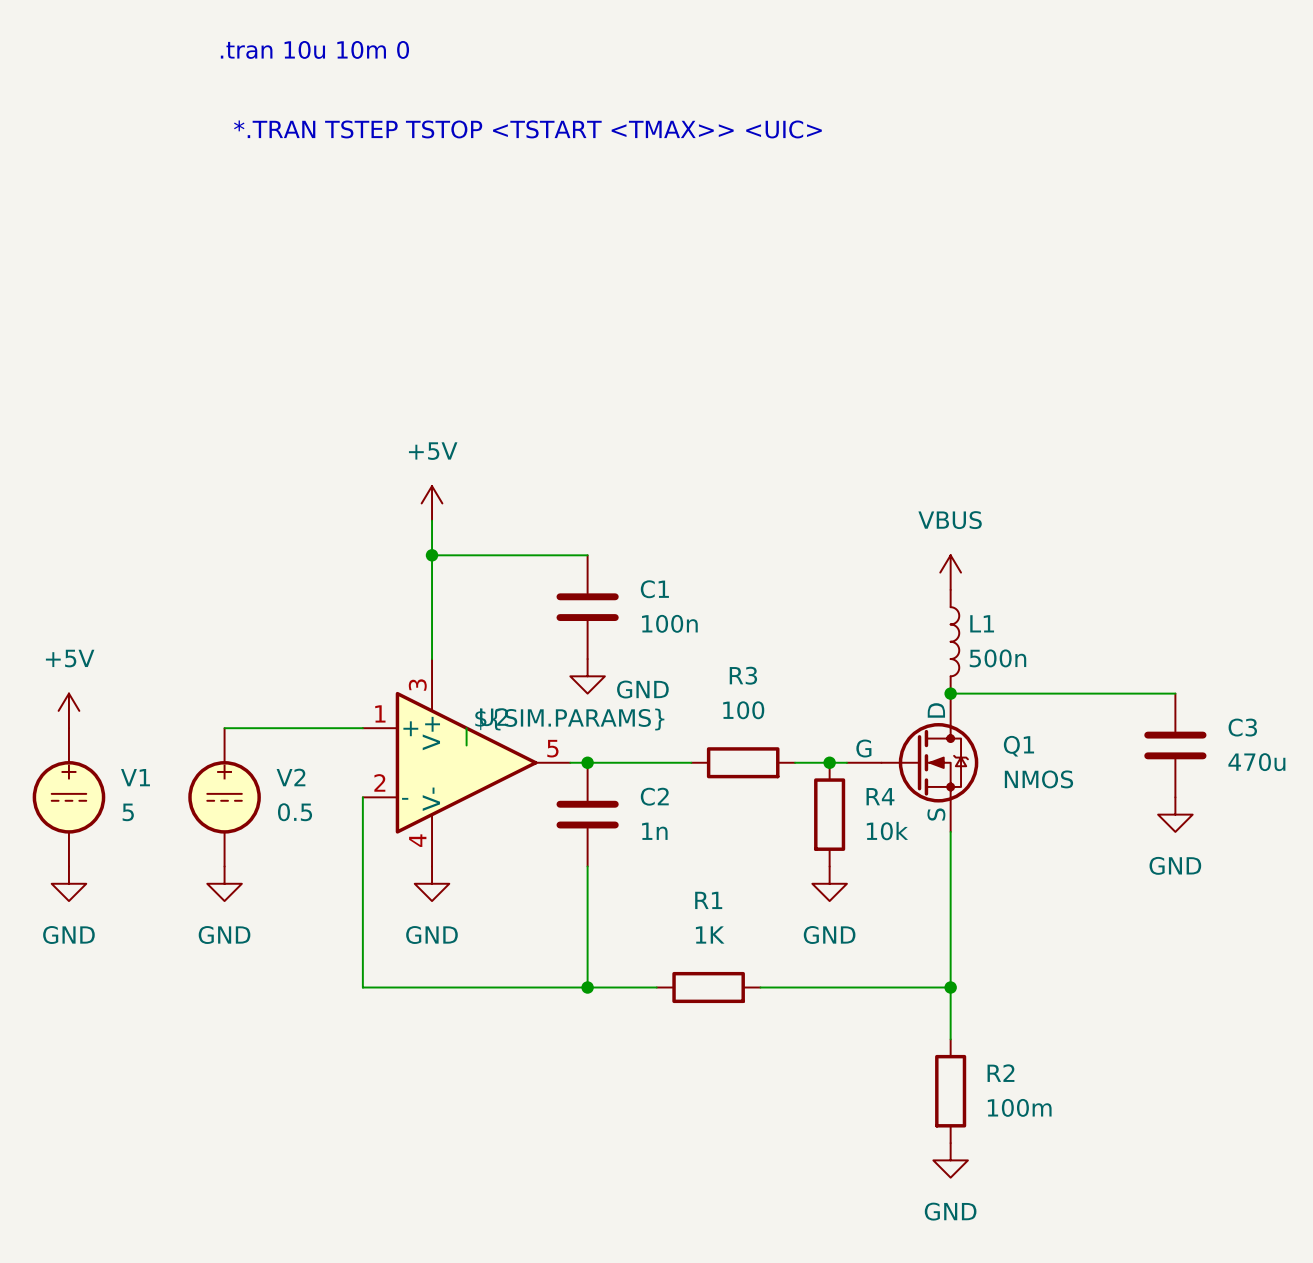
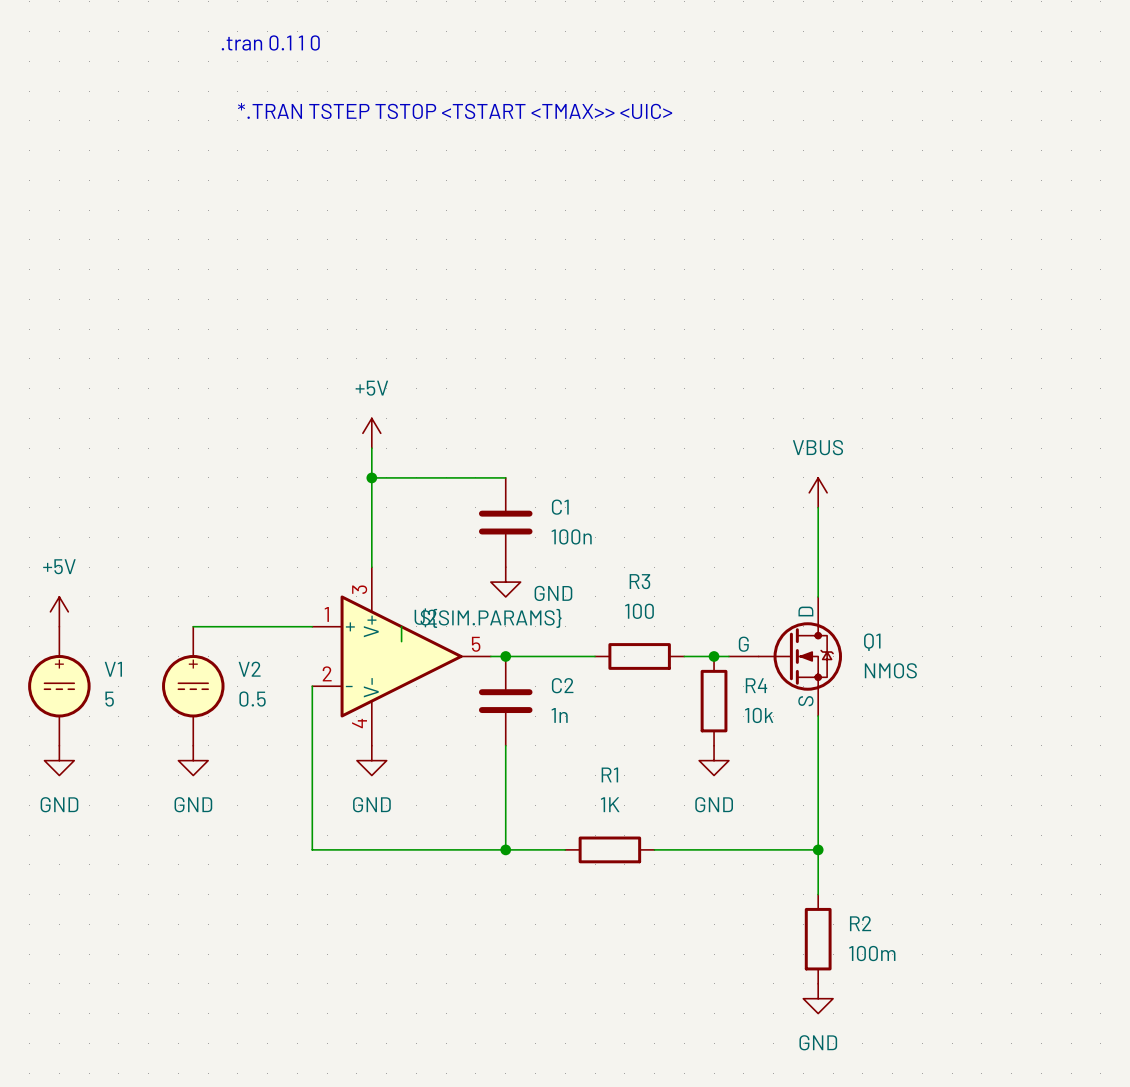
text: .tran 10u 10m 0 (314, 49) -> .tran 0.1 1 0 (270, 42)
L1: 500n (954, 641) -> none
wire: (950, 693) (1175, 693) -> (818, 596) (818, 507)
junction: (950, 693) -> none
C3: 470u (1175, 745) -> none
power symbol: GND (1175, 814) -> none

